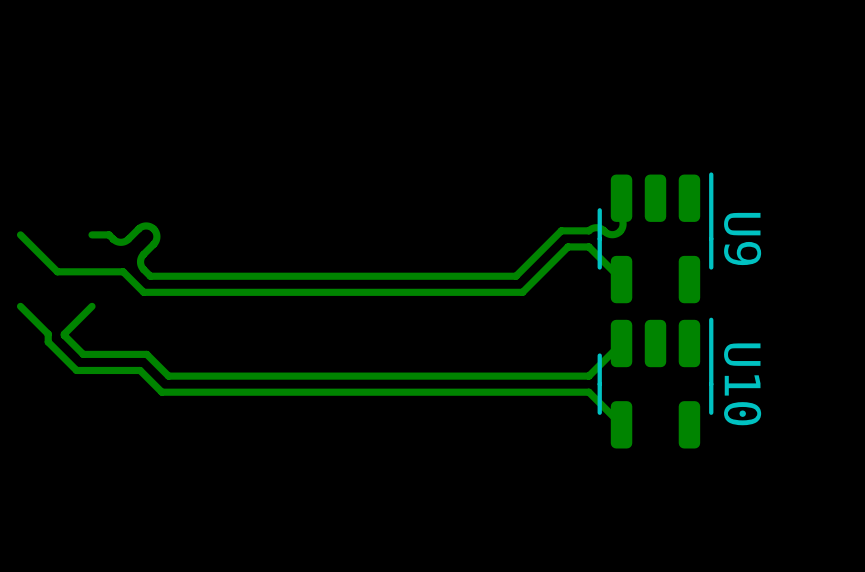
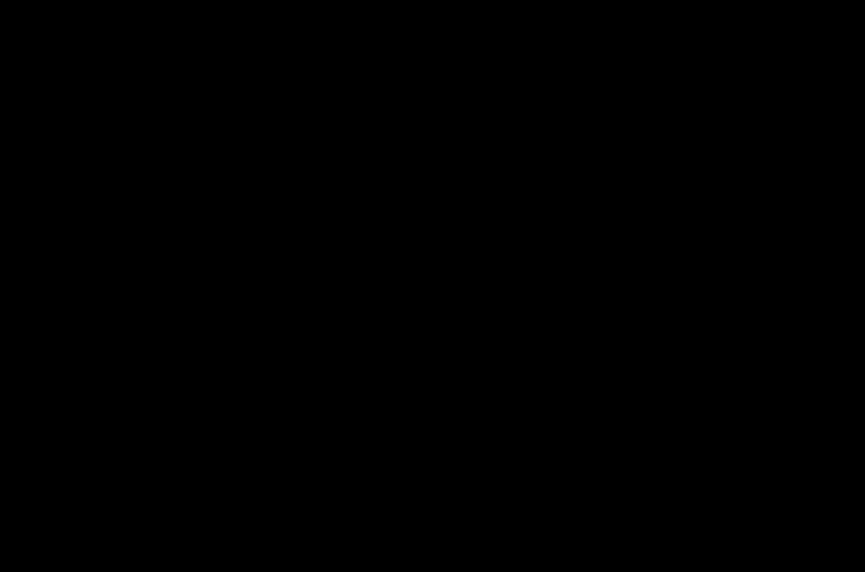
bottom track: (621, 198) (616, 206) (623, 222) (619, 232) (609, 234) (596, 227) (588, 230) (561, 230) (515, 276) (150, 276) (142, 267) (140, 261) (142, 255) (156, 240) (156, 233) (151, 227) (141, 227) (127, 239) (122, 242) (115, 240) (109, 234) (92, 234) -> none
bottom track: (20, 234) (57, 271) (123, 271) (143, 292) (522, 292) (568, 246) (588, 246) (621, 279) -> none
U9: (655, 237) -> none
bottom track: (20, 306) (48, 334) (48, 342) (76, 370) (140, 370) (161, 392) (588, 392) (621, 424) -> none
bottom track: (92, 306) (64, 334) (83, 354) (146, 354) (168, 376) (588, 376) (621, 343) -> none
U10: (655, 383) -> none

